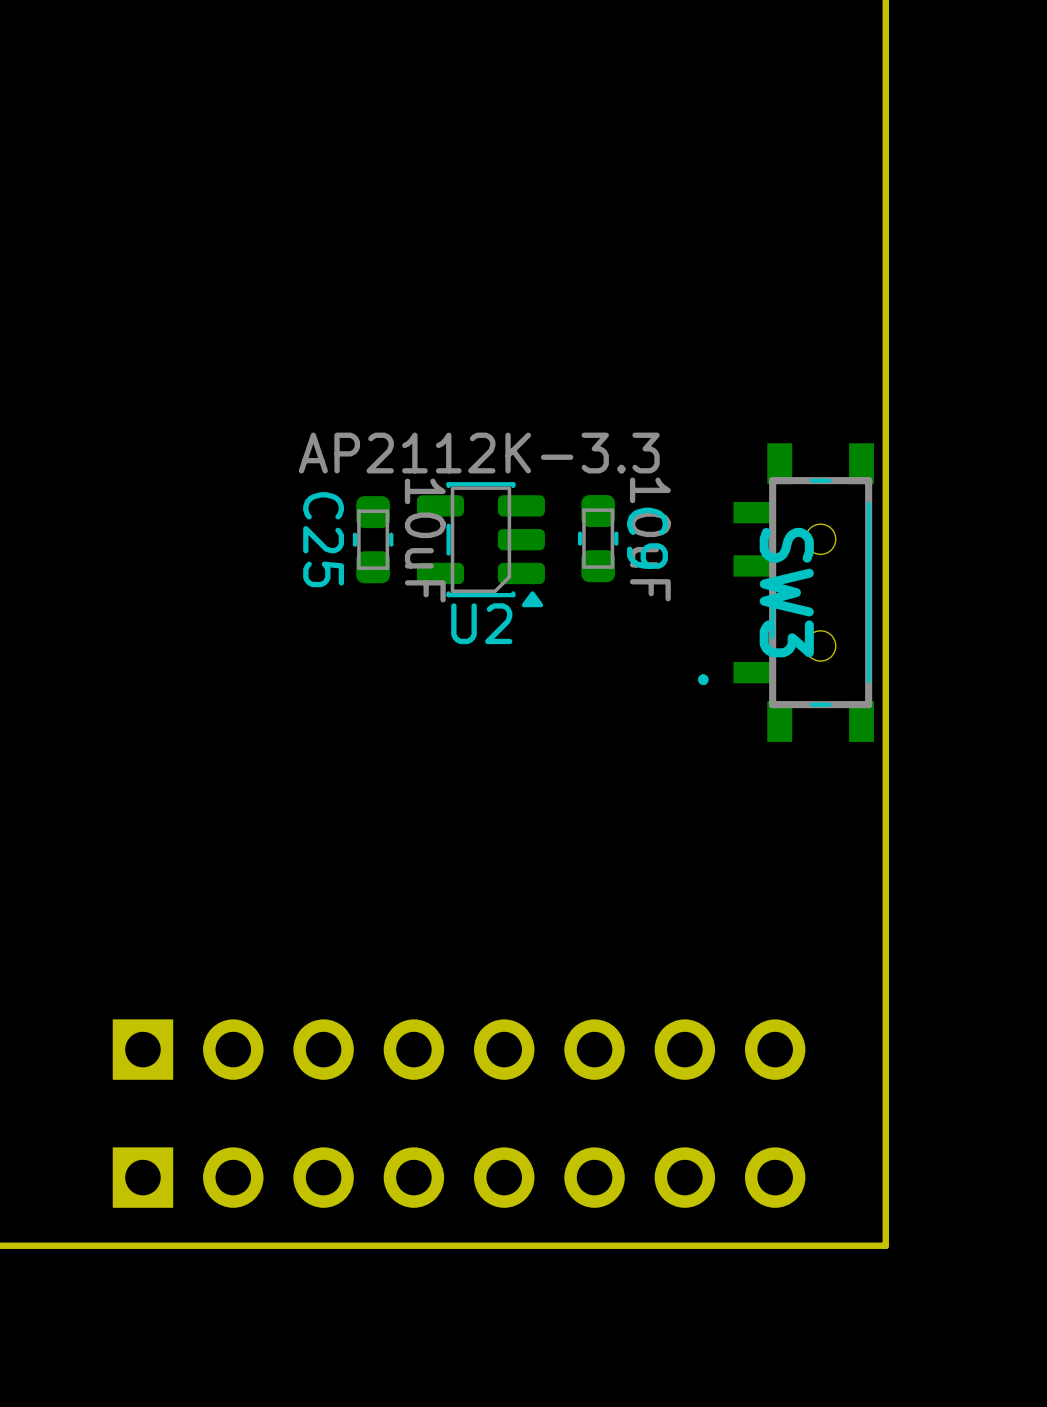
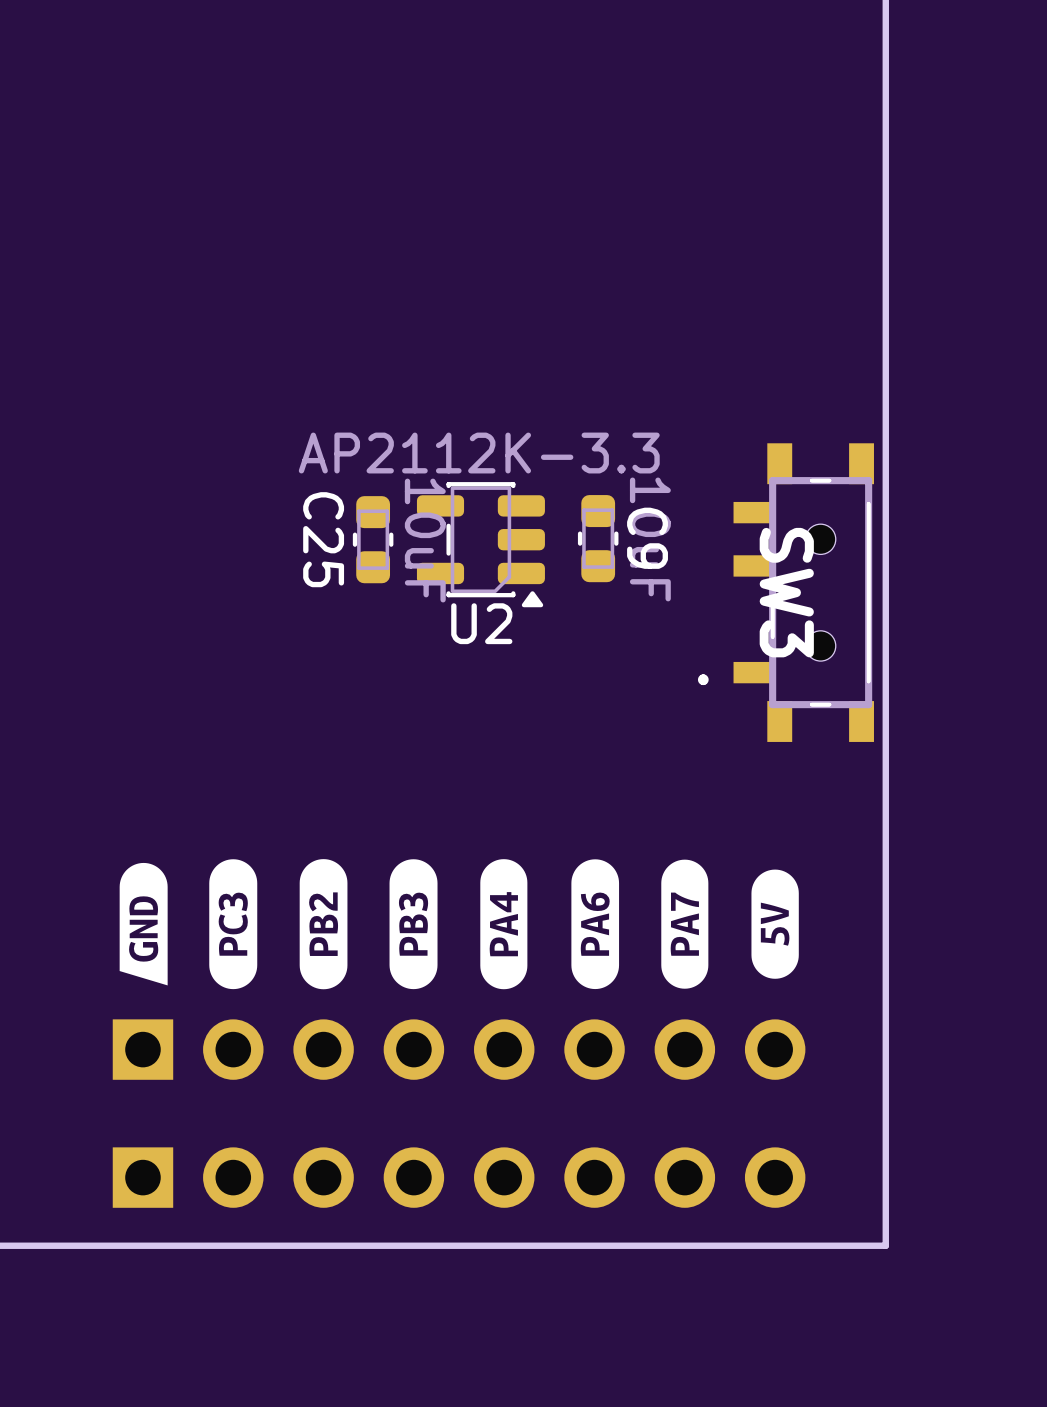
drawing: none -> [119, 859, 438, 990]
drawing: none -> [480, 859, 528, 990]
drawing: none -> [571, 859, 709, 990]
drawing: none -> [751, 869, 799, 979]

